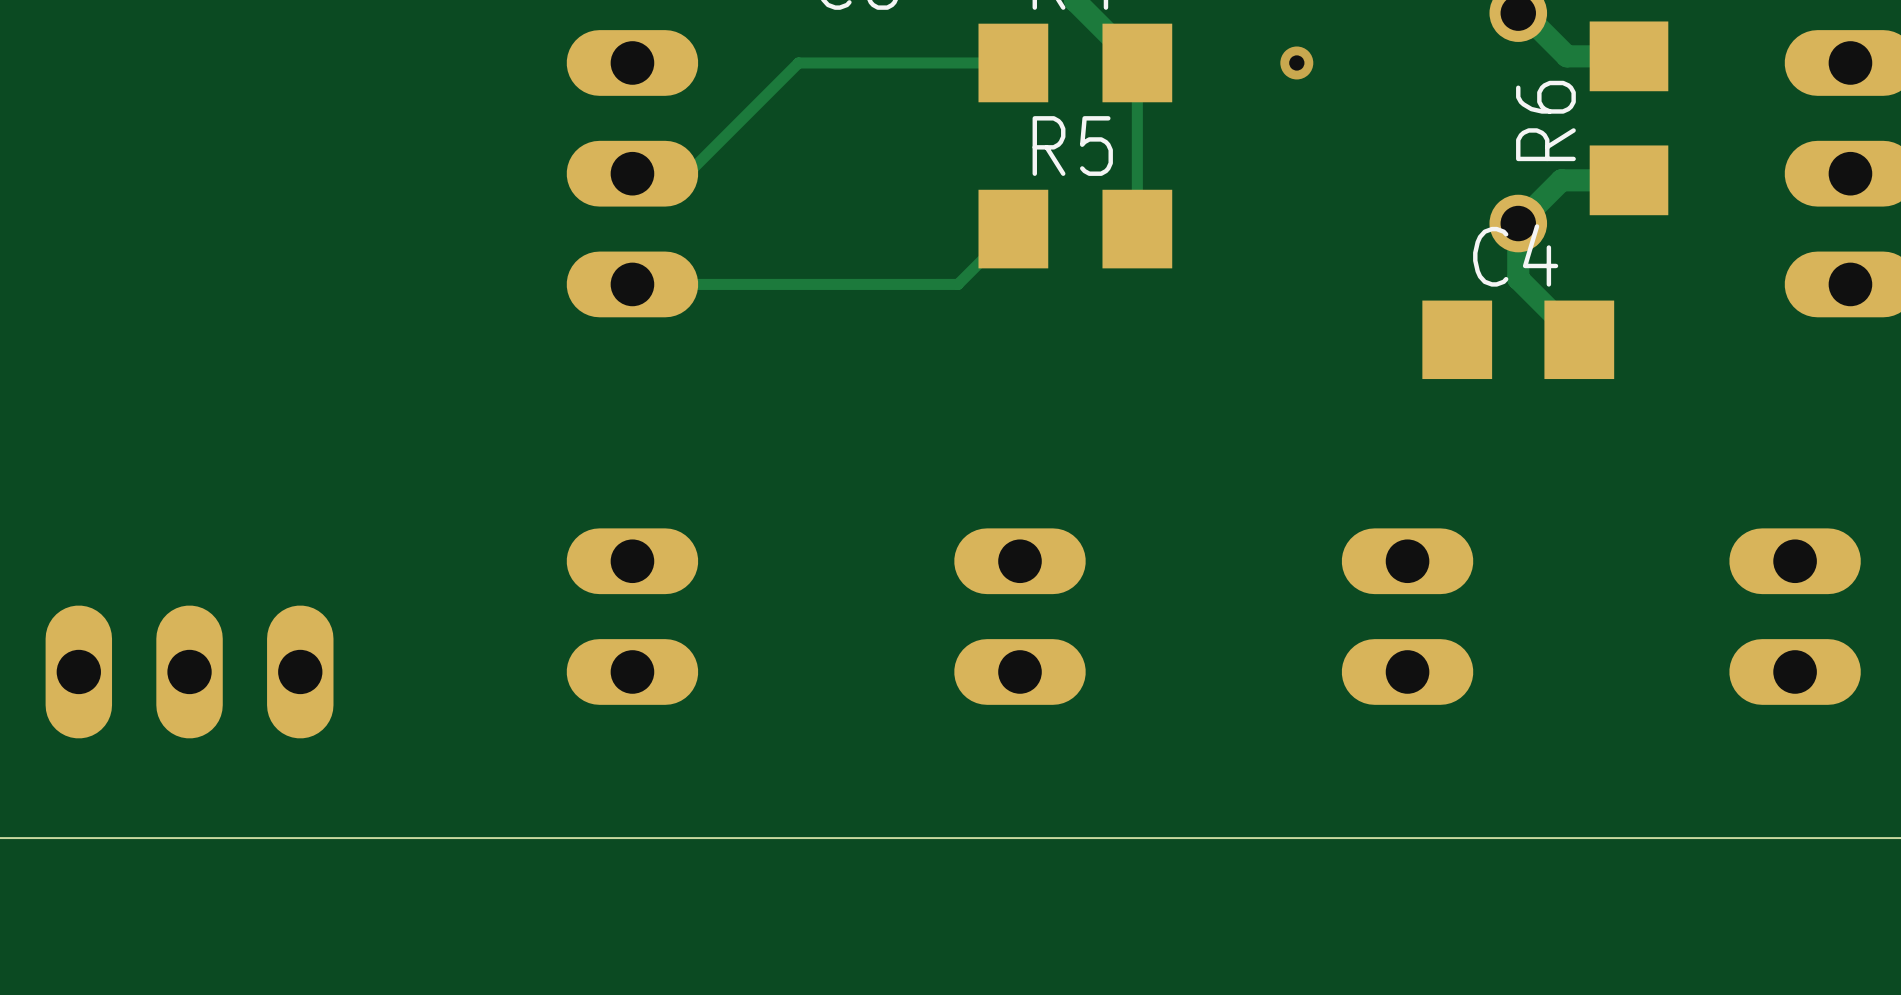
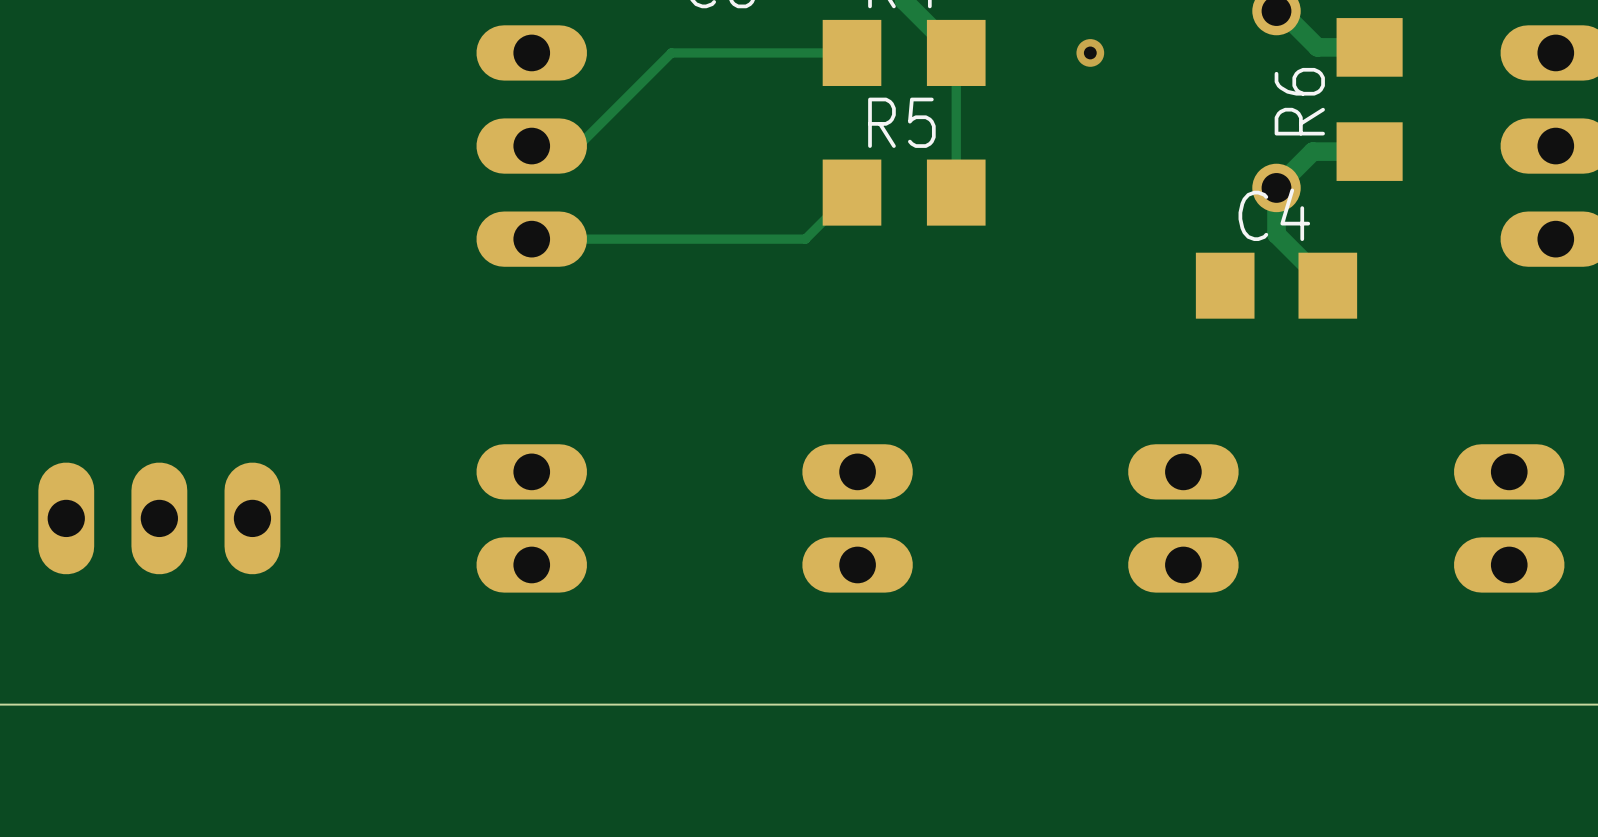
part position: (189, 671) -> (159, 518)

